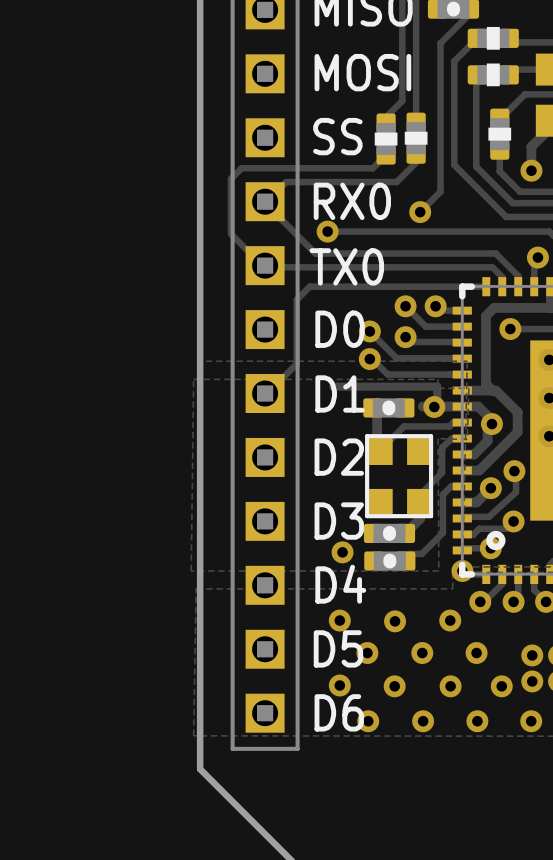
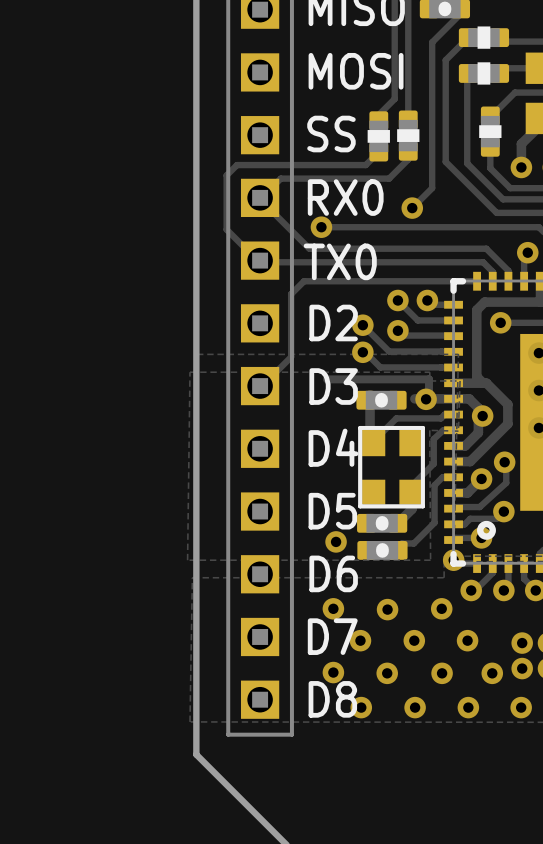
text: D0 (340, 329) -> D2 (333, 322)
text: D1 (340, 393) -> D3 (333, 386)
text: D2 (339, 457) -> D4 (333, 447)
text: D3 (339, 521) -> D5 (332, 511)
text: D4 (340, 584) -> D6 (333, 573)
text: D5 (338, 648) -> D7 (332, 636)
text: D6 (339, 712) -> D8 (332, 699)

